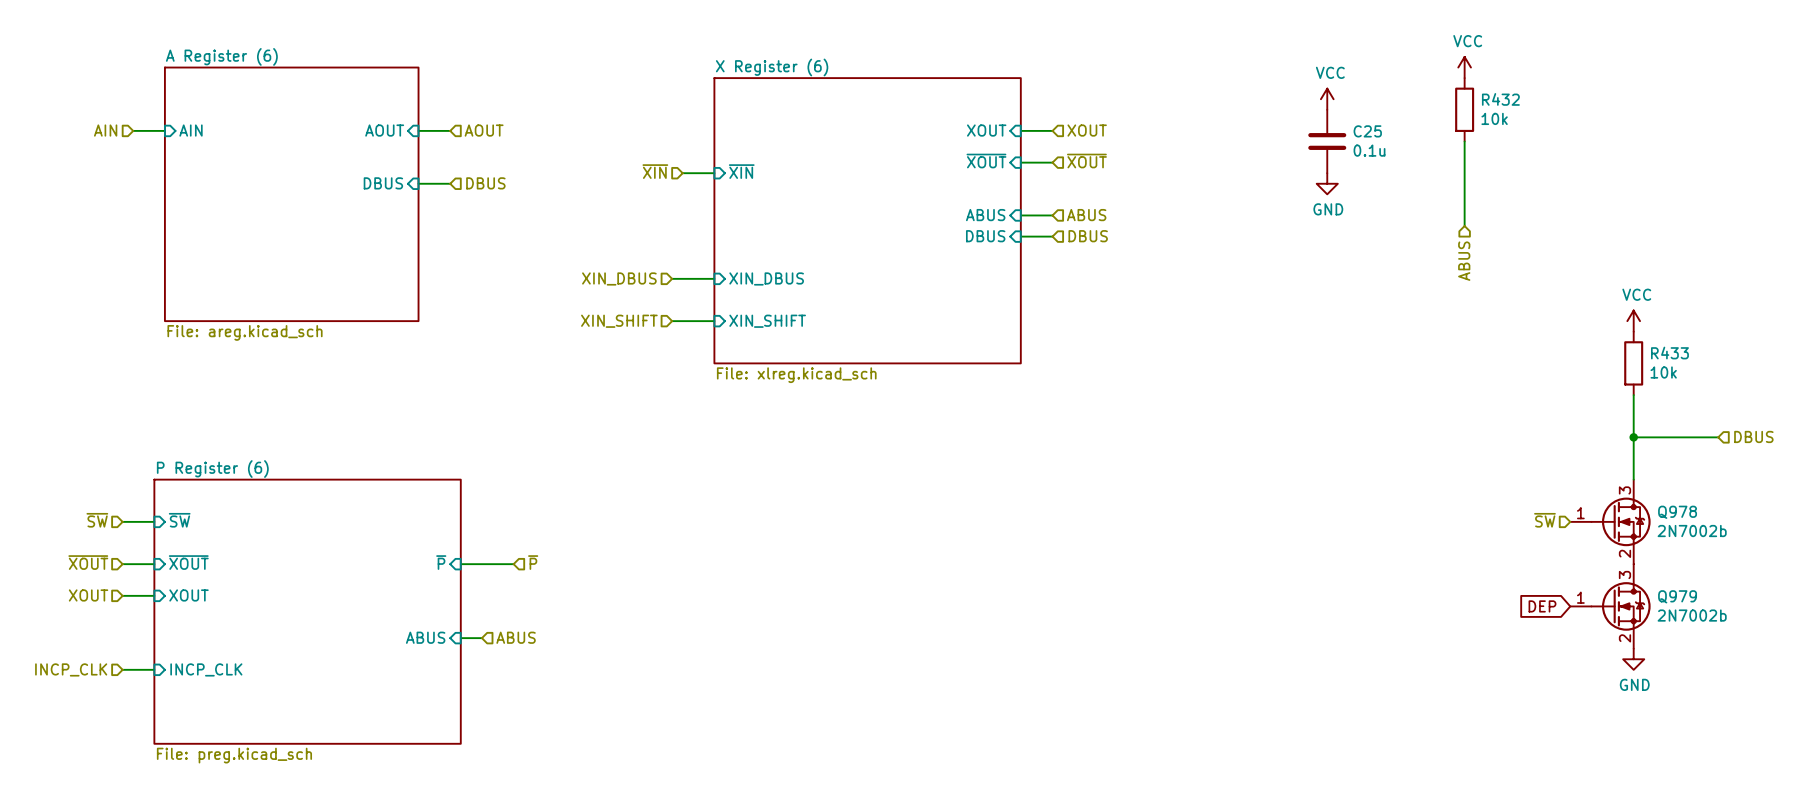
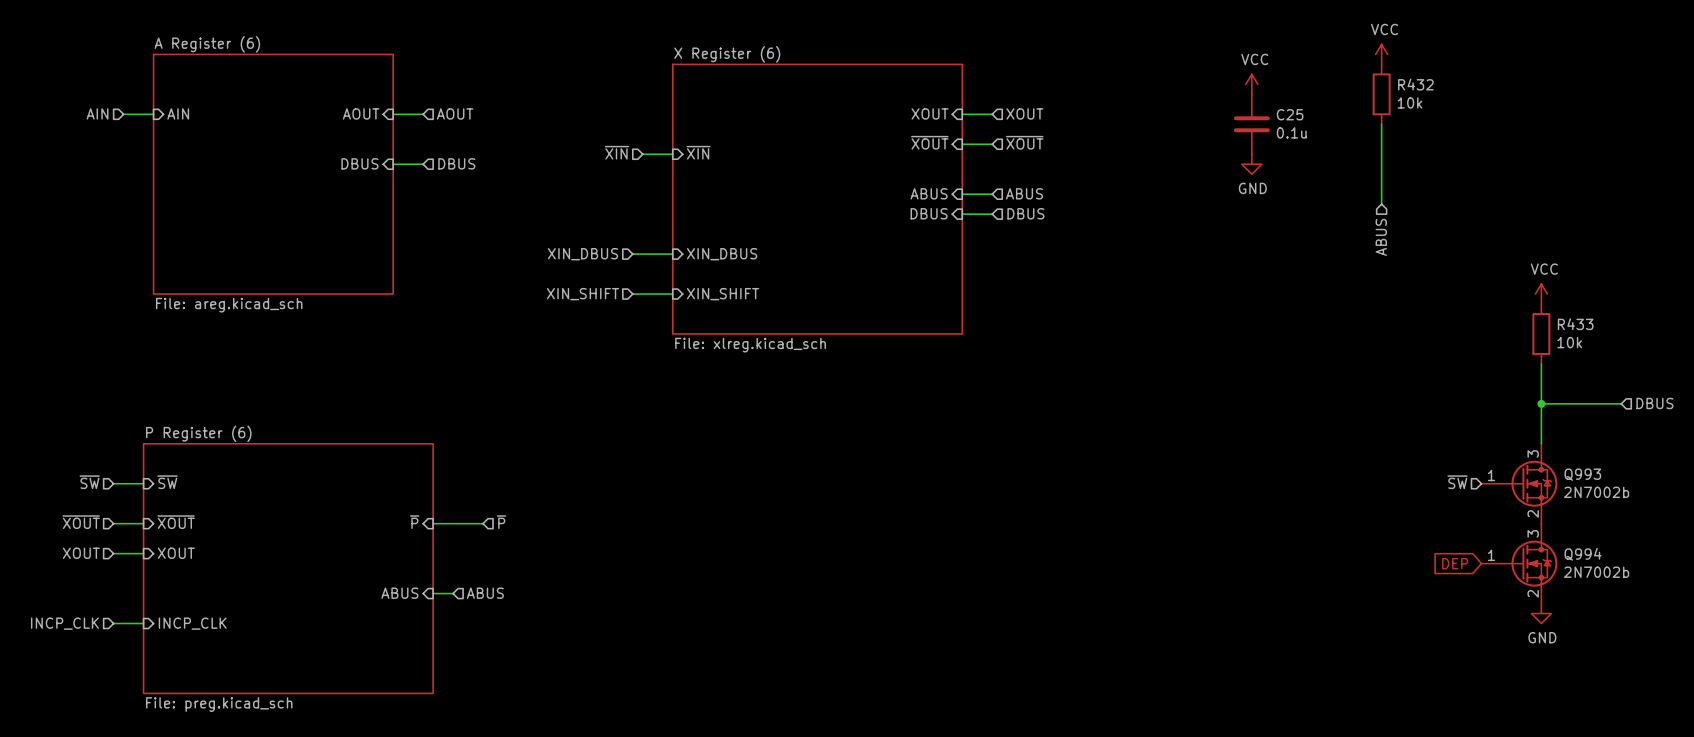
Q978 name: Q978 (1677, 512) -> Q993 (1582, 474)
Q979 name: Q979 (1677, 596) -> Q994 (1583, 554)

